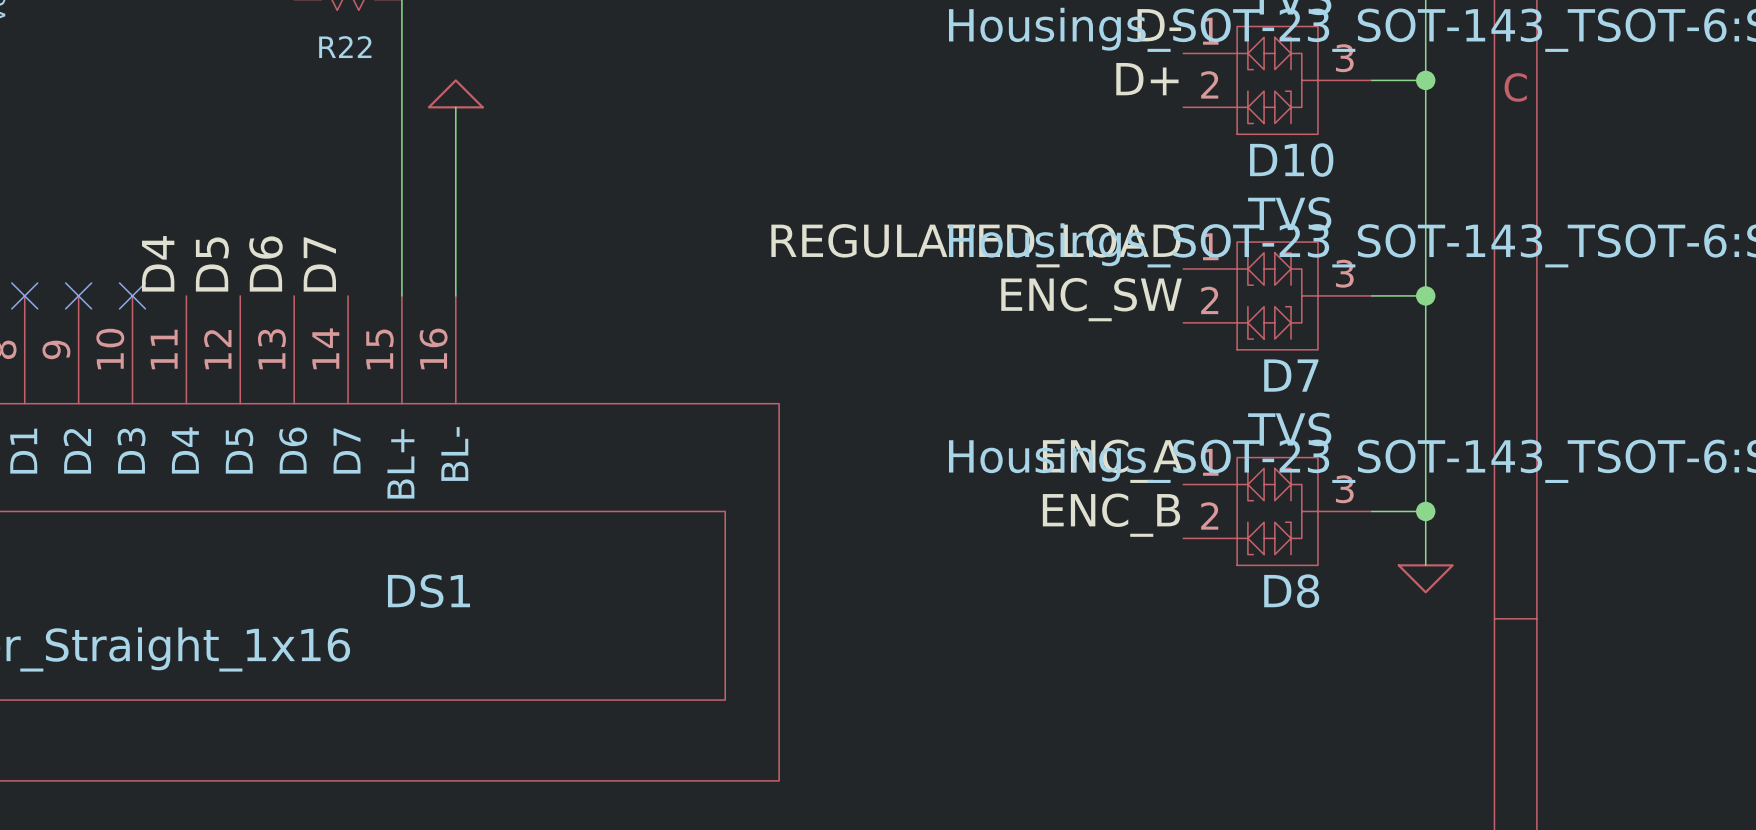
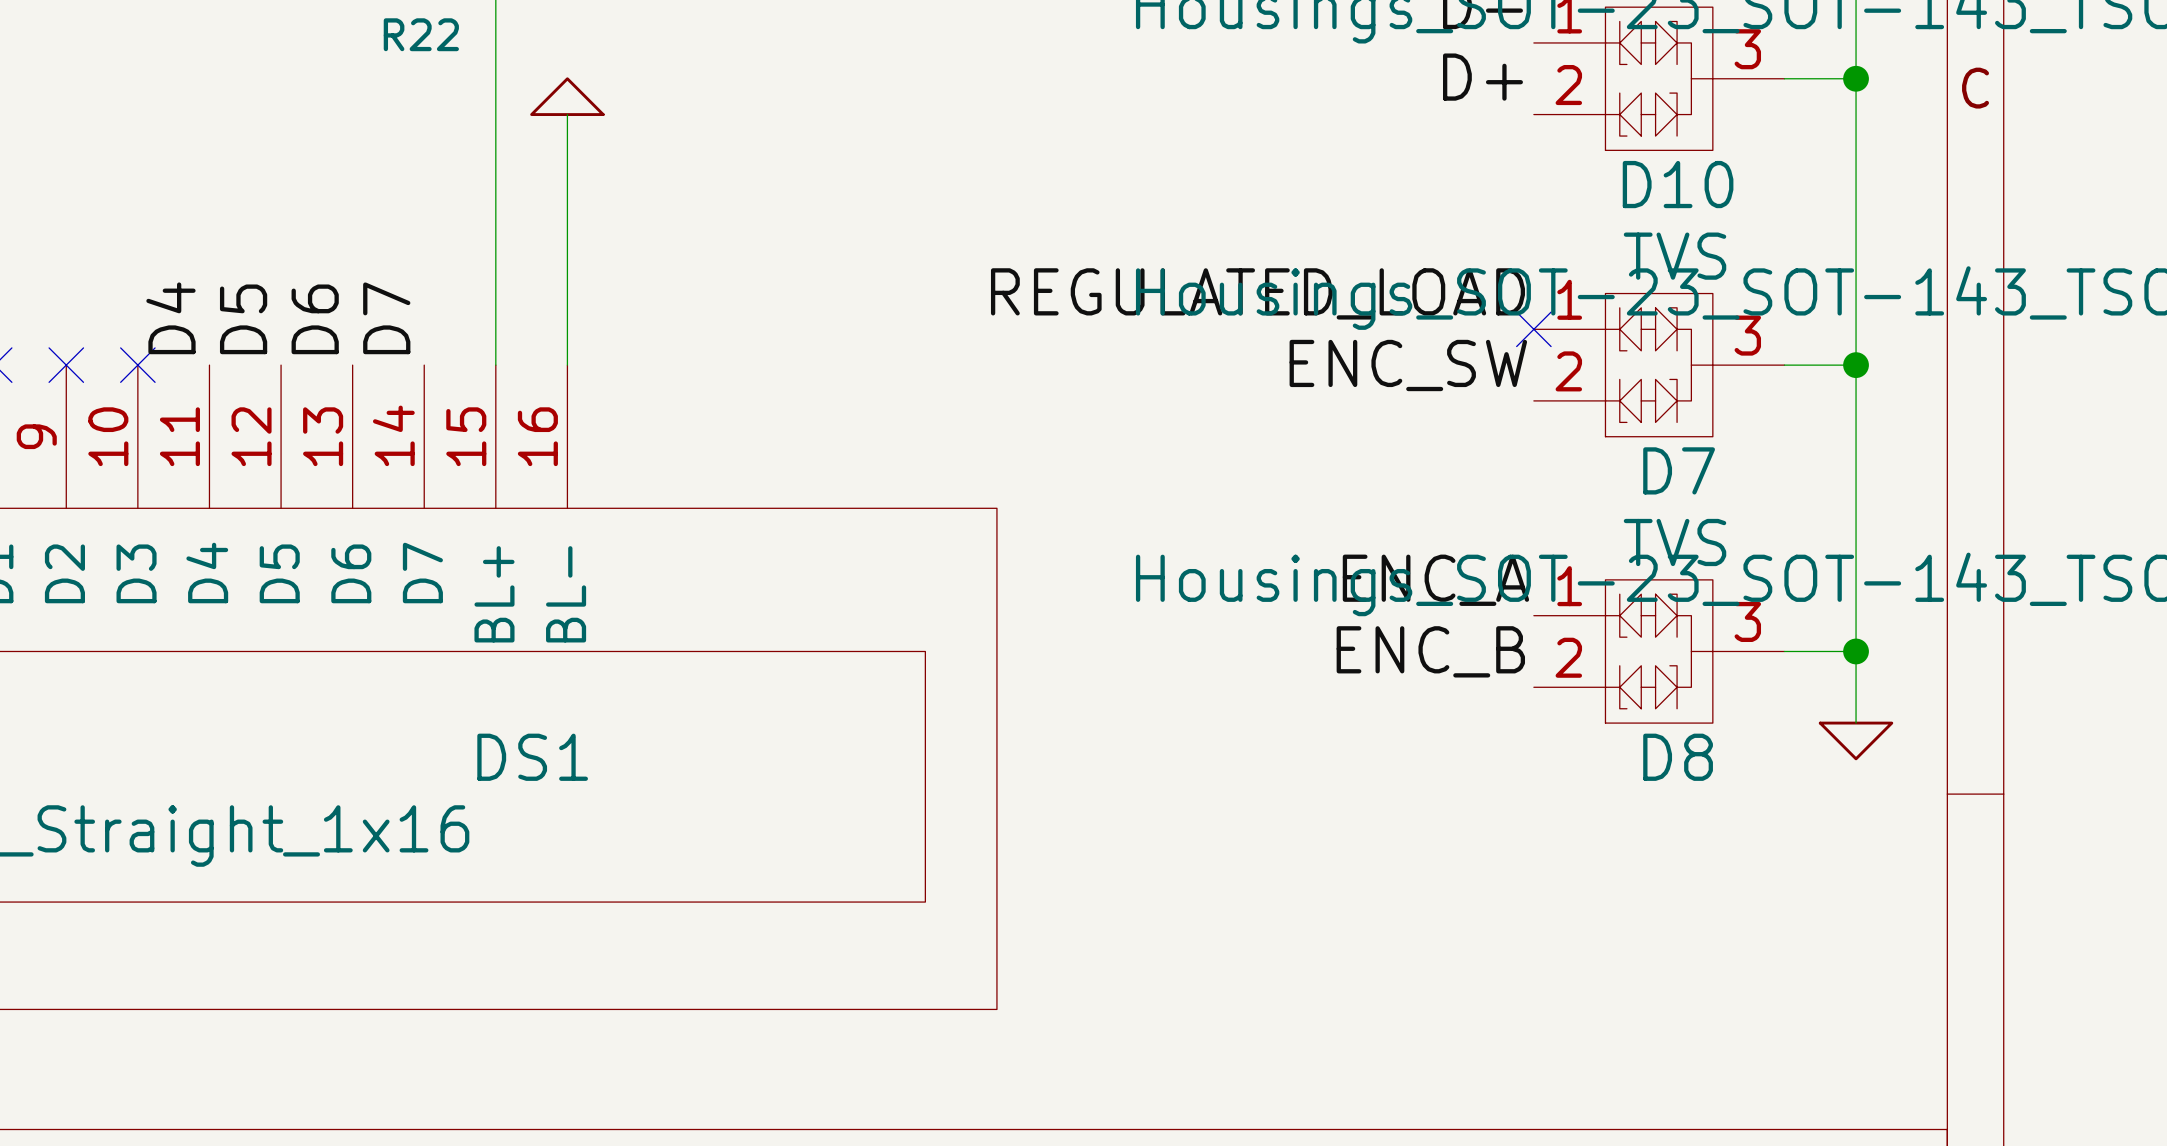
no-connect mark: none -> (1533, 329)

